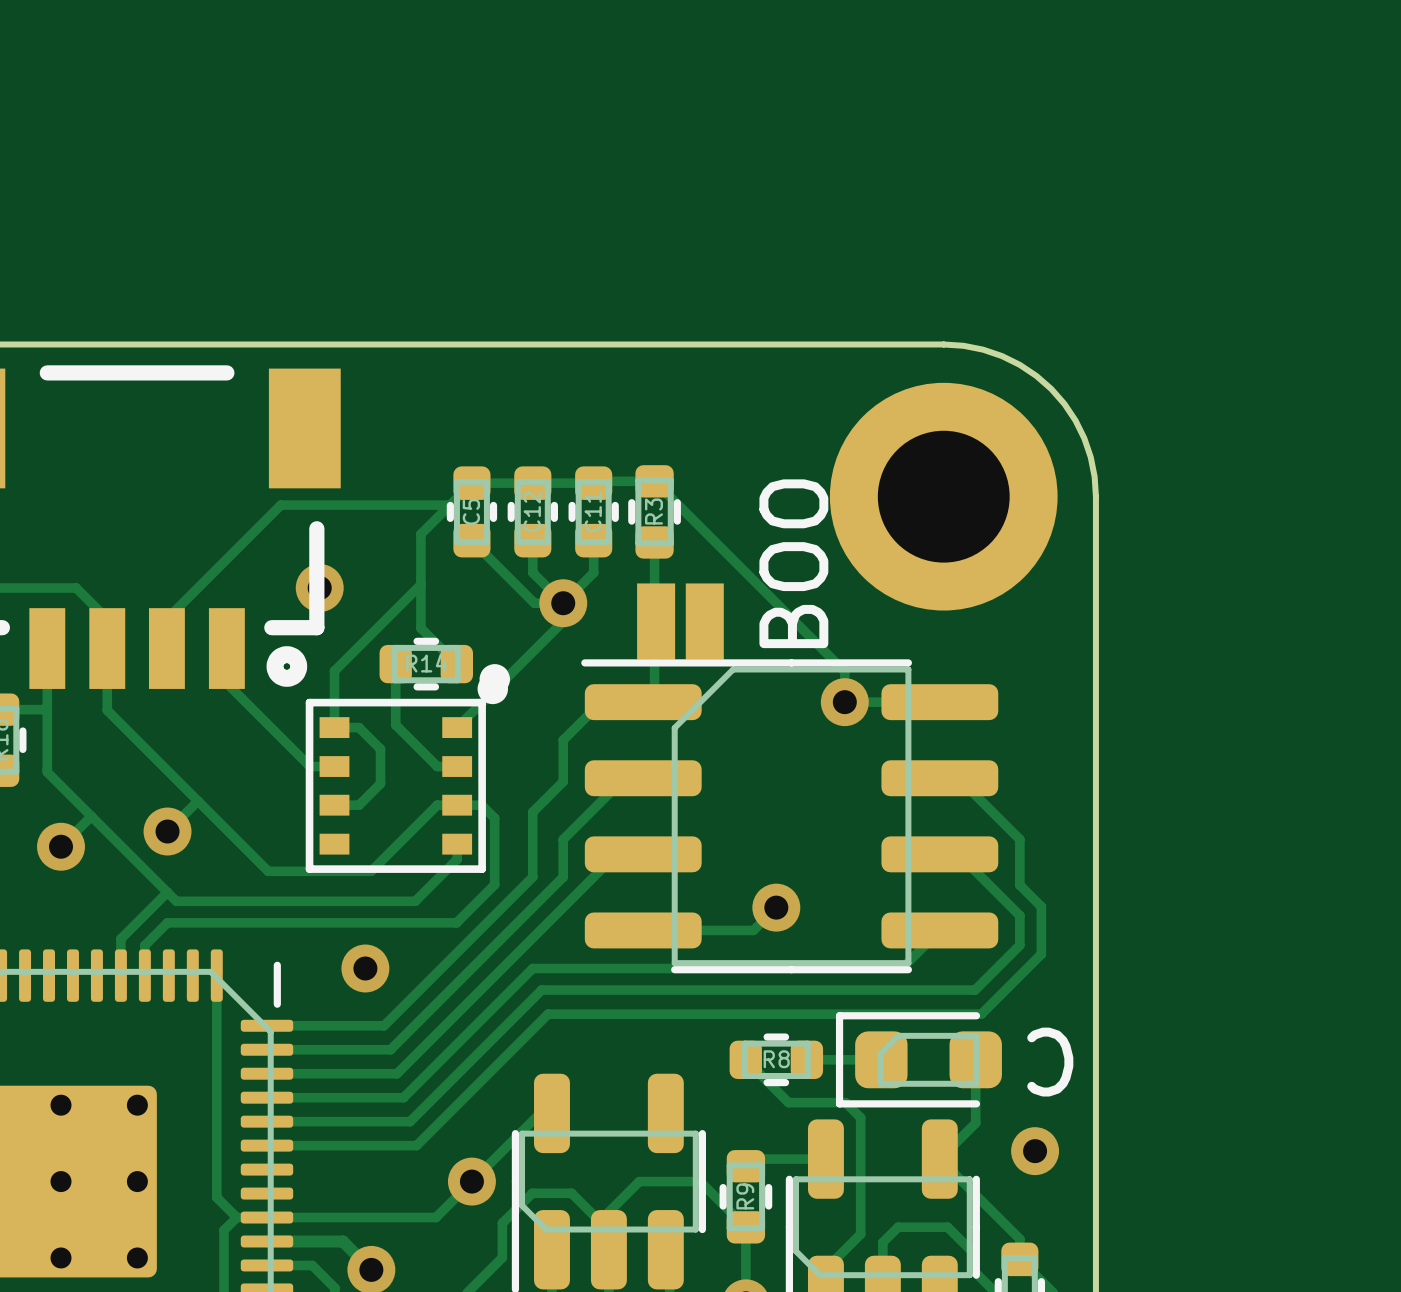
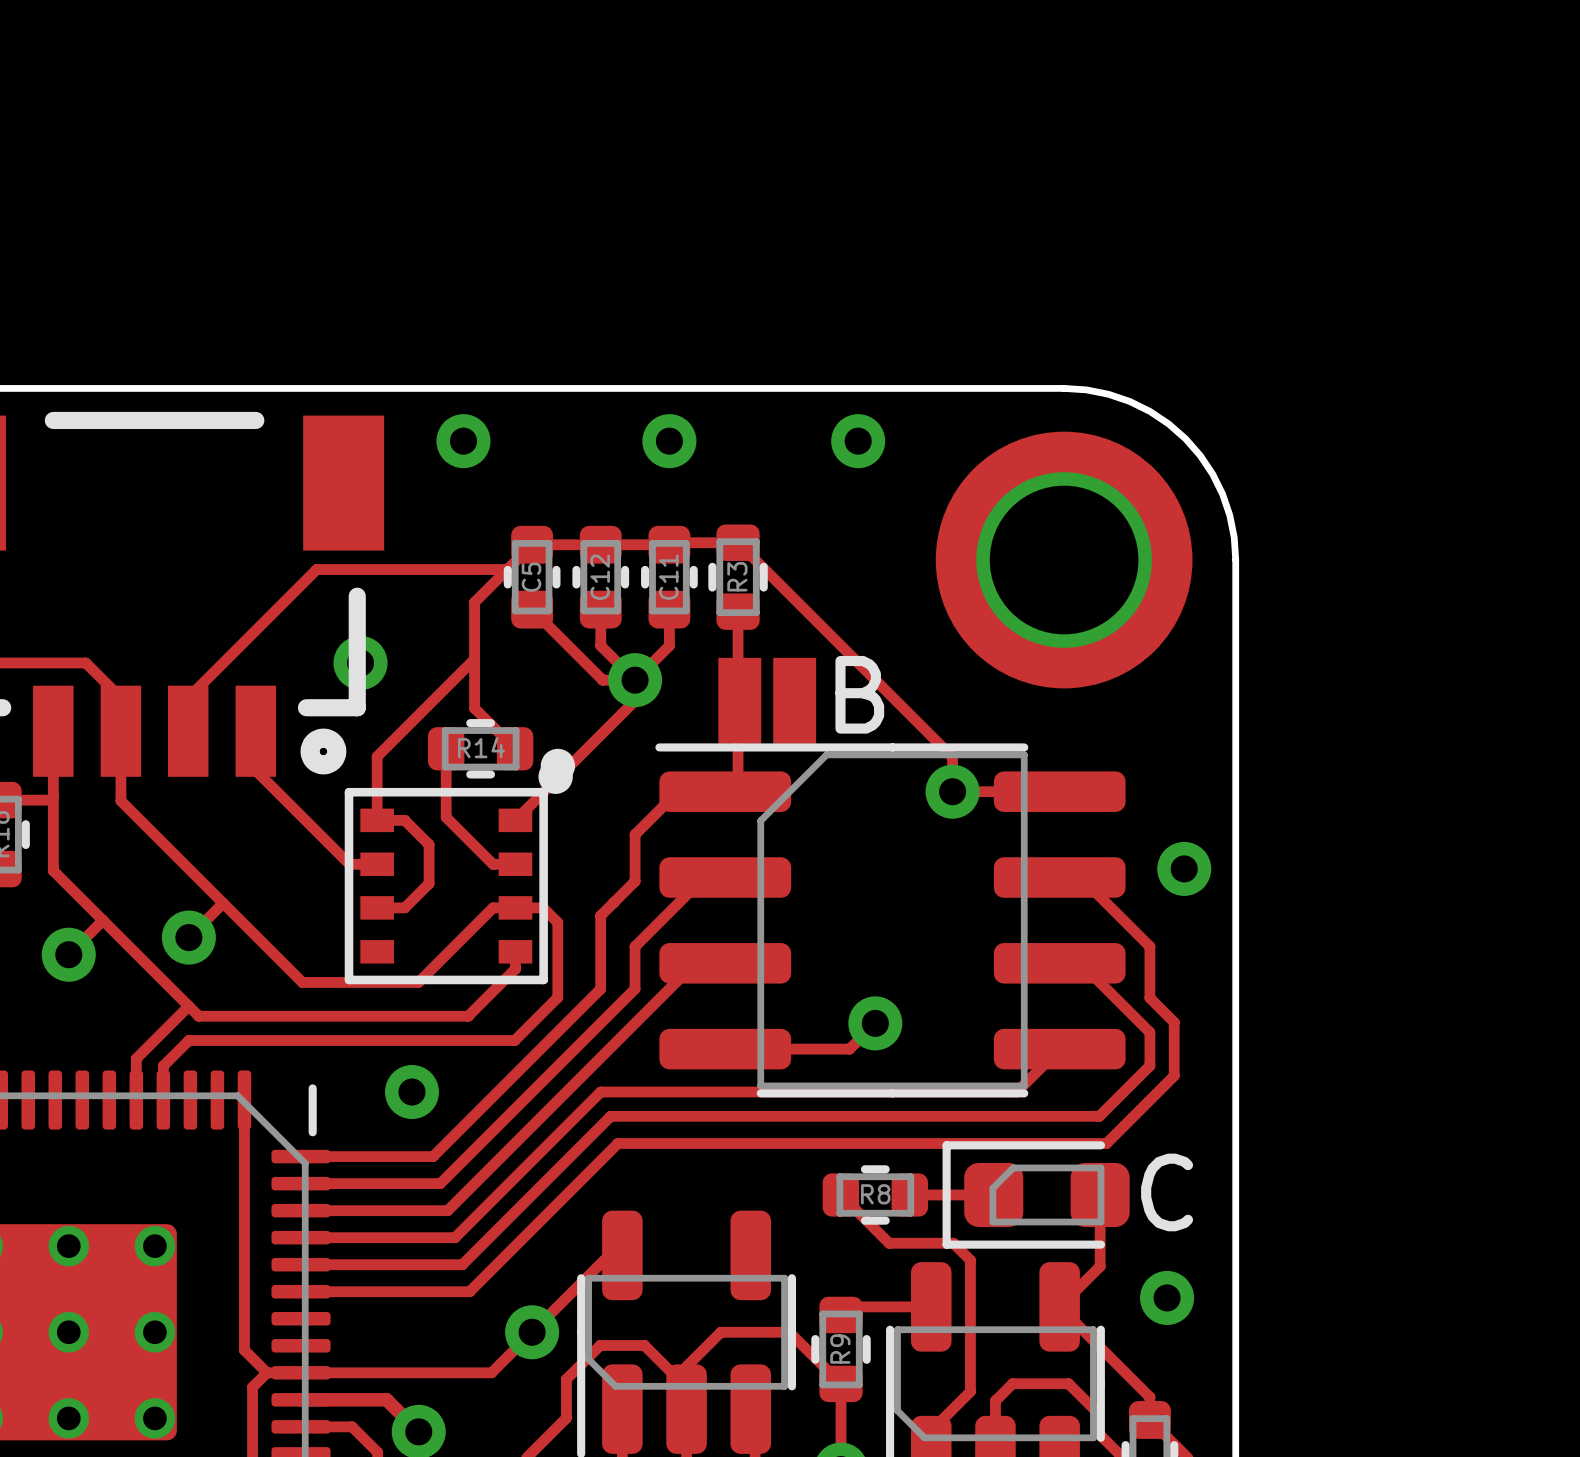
via: none -> (463, 441)
via: none -> (669, 441)
via: none -> (858, 441)
text: BOO (793, 563) -> none
text: none -> B (859, 694)
via: none -> (1184, 868)
text rotation: 0° (1050, 1062) -> 180° (1167, 1192)

